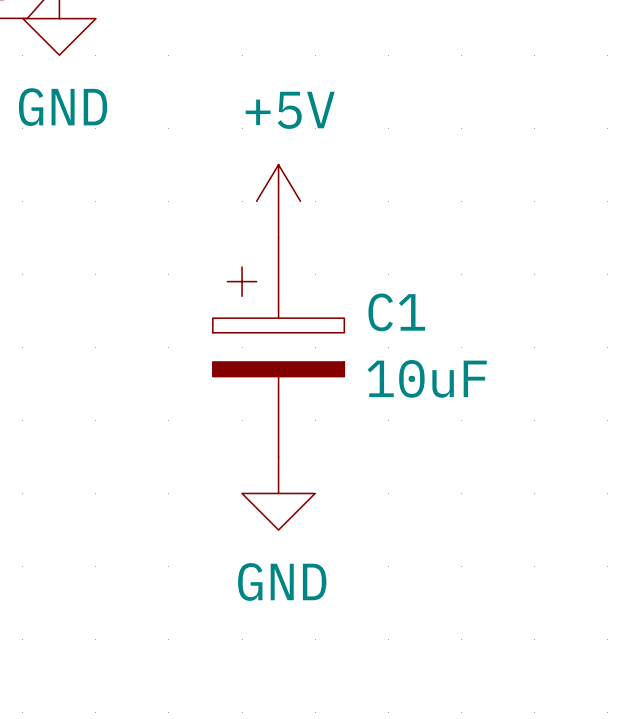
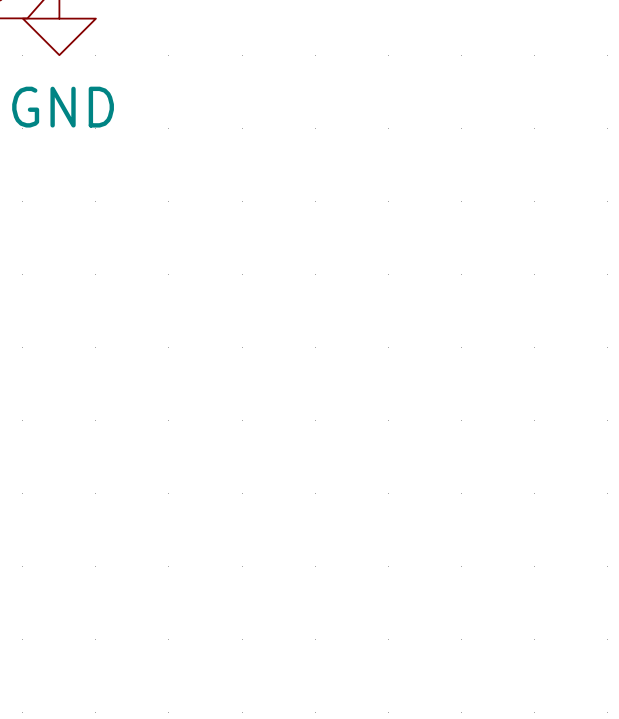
power symbol: +5V (278, 201) -> none
C1: 10uF (278, 347) -> none
power symbol: GND (278, 493) -> none

